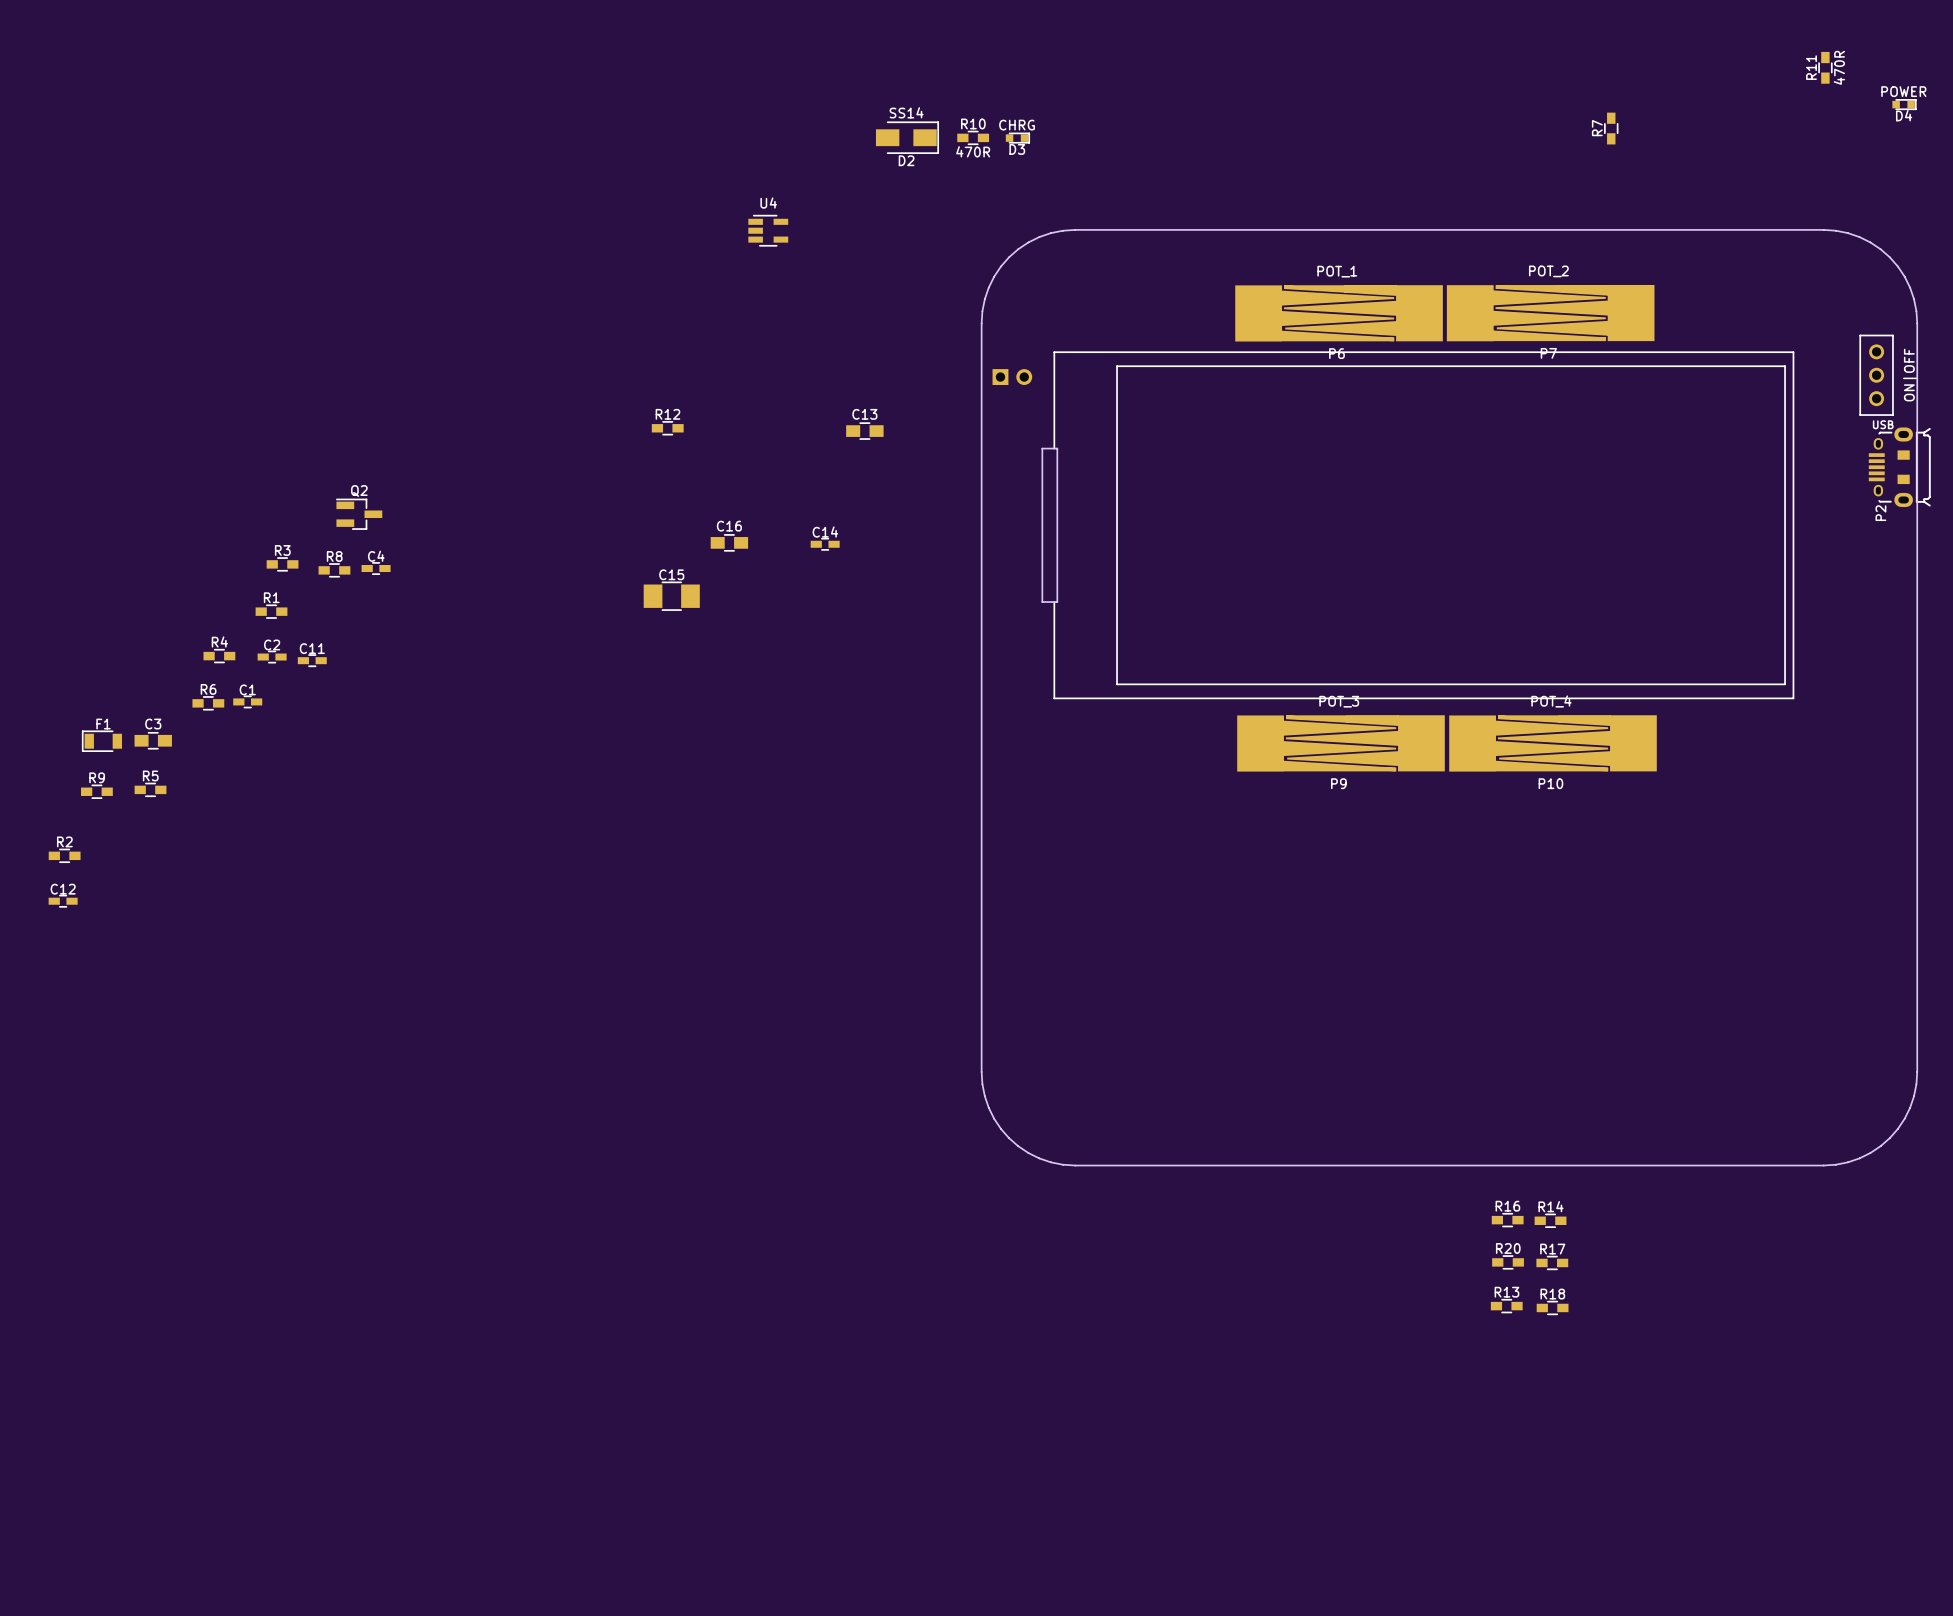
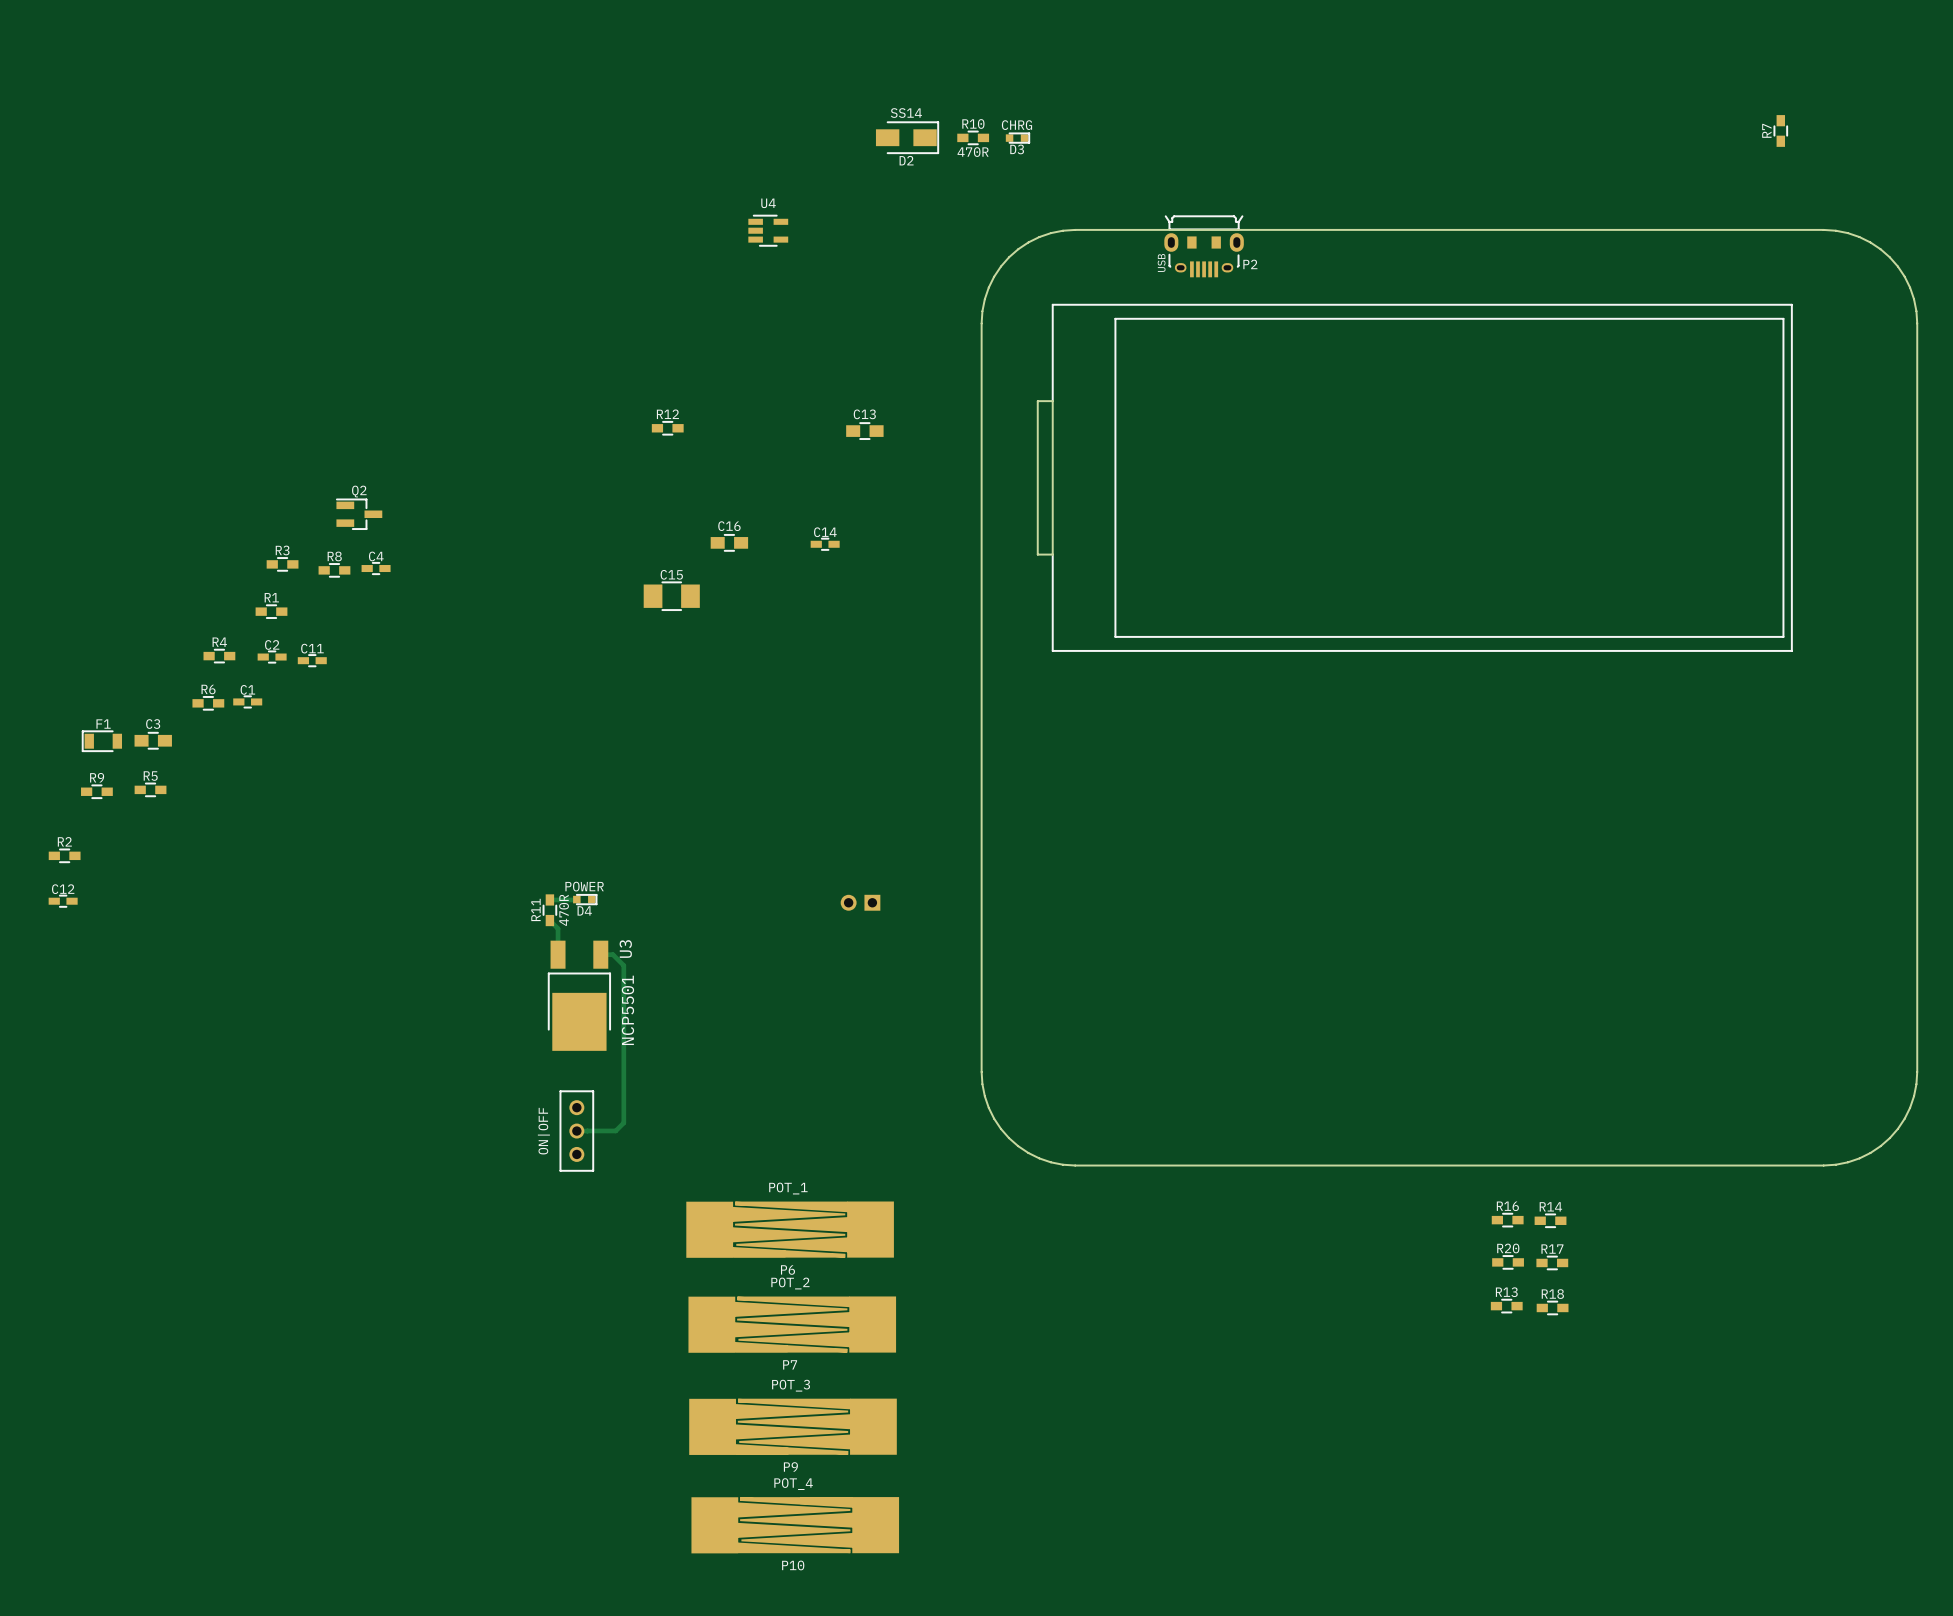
R11 position: (1825, 67) -> (549, 910)
D4 position: (1904, 104) -> (585, 899)
R7 position: (1611, 128) -> (1780, 130)
P6 position: (1339, 313) -> (790, 1229)
P7 position: (1550, 313) -> (792, 1324)
line: (1117, 366) (1117, 684) (1785, 684) (1785, 366) (1117, 366) -> (1115, 318) (1115, 636) (1783, 636) (1783, 318) (1115, 318)
part: ON|OFF (1876, 375) -> none
part: (1012, 377) -> none
board edge: (1042, 448) (1042, 602) (1057, 602) (1057, 448) (1042, 448) -> (1037, 401) (1037, 554) (1052, 554) (1052, 401) (1037, 401)
line: (1054, 448) (1054, 352) (1793, 352) (1793, 698) (1054, 698) (1054, 602) -> (1052, 401) (1052, 304) (1791, 304) (1791, 650) (1052, 650) (1052, 554)
P2 rotation: 0° (1899, 467) -> 90° counterclockwise (1204, 246)
P2 position: (1899, 467) -> (1204, 246)
P9 position: (1341, 743) -> (793, 1426)
P10 position: (1553, 743) -> (795, 1525)
track: none -> (576, 899) (549, 899)
part: none -> (860, 902)
track: none -> (549, 920) (558, 928) (558, 954)
track: none -> (600, 954) (612, 954) (623, 965) (623, 1122) (615, 1130) (587, 1130)
U3: none -> NCP5501 (579, 995)
part: none -> ON|OFF (576, 1131)

